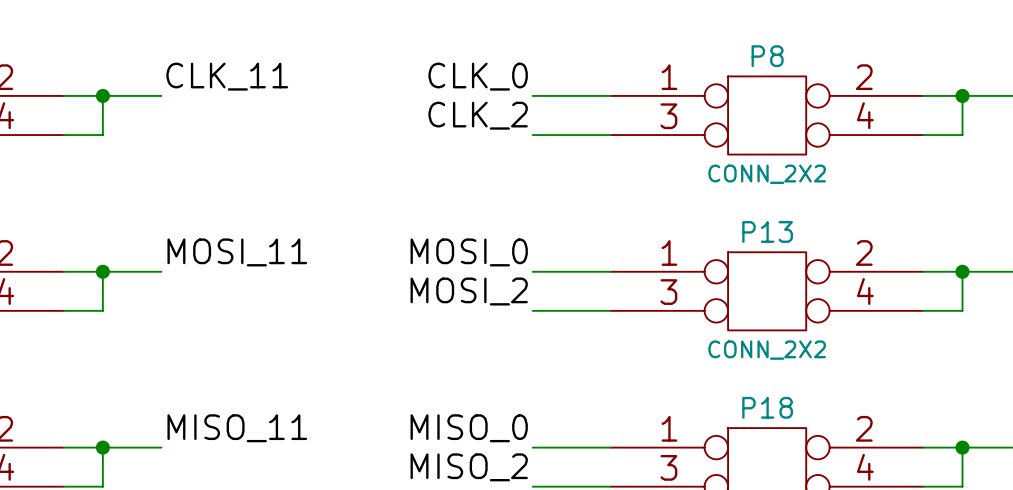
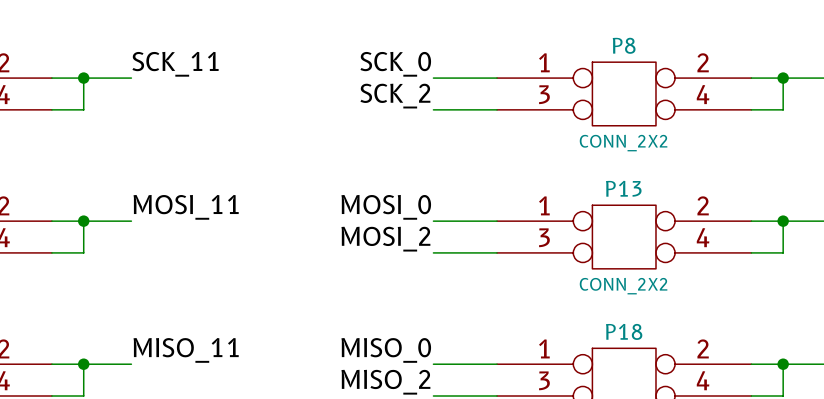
label: CLK_11 (227, 76) -> SCK_11 (175, 64)
label: CLK_0 (478, 76) -> SCK_0 (395, 64)
label: CLK_2 (478, 115) -> SCK_2 (395, 96)

